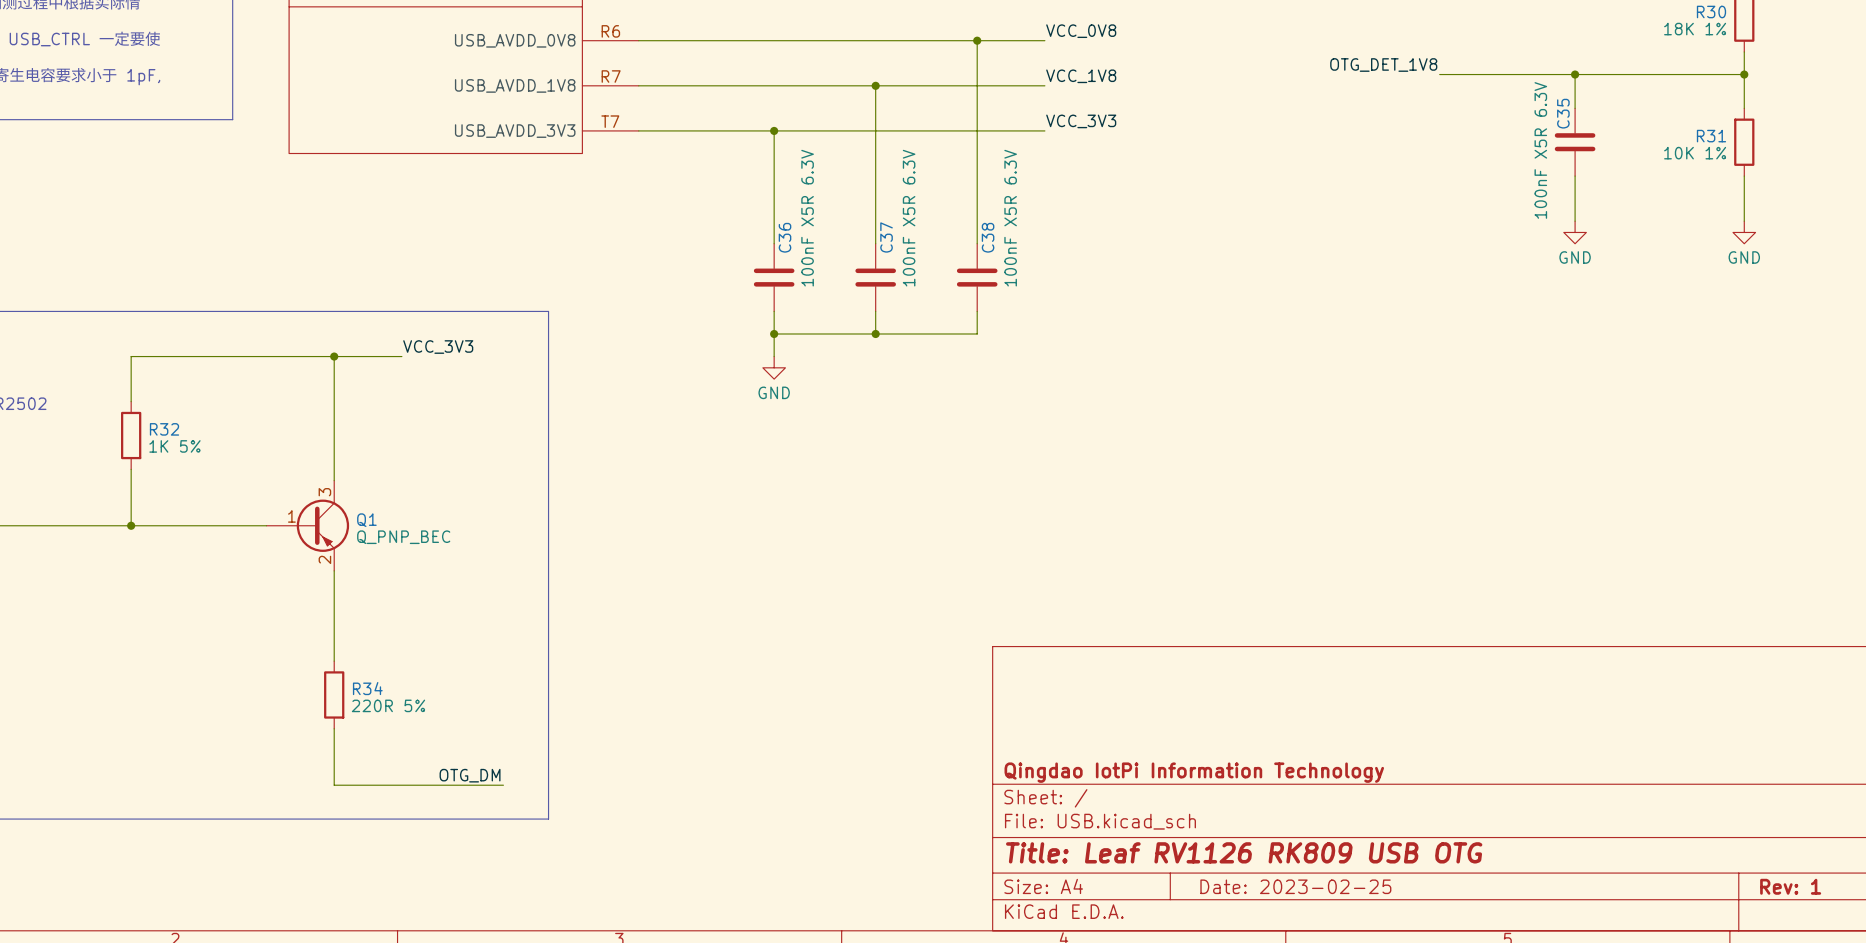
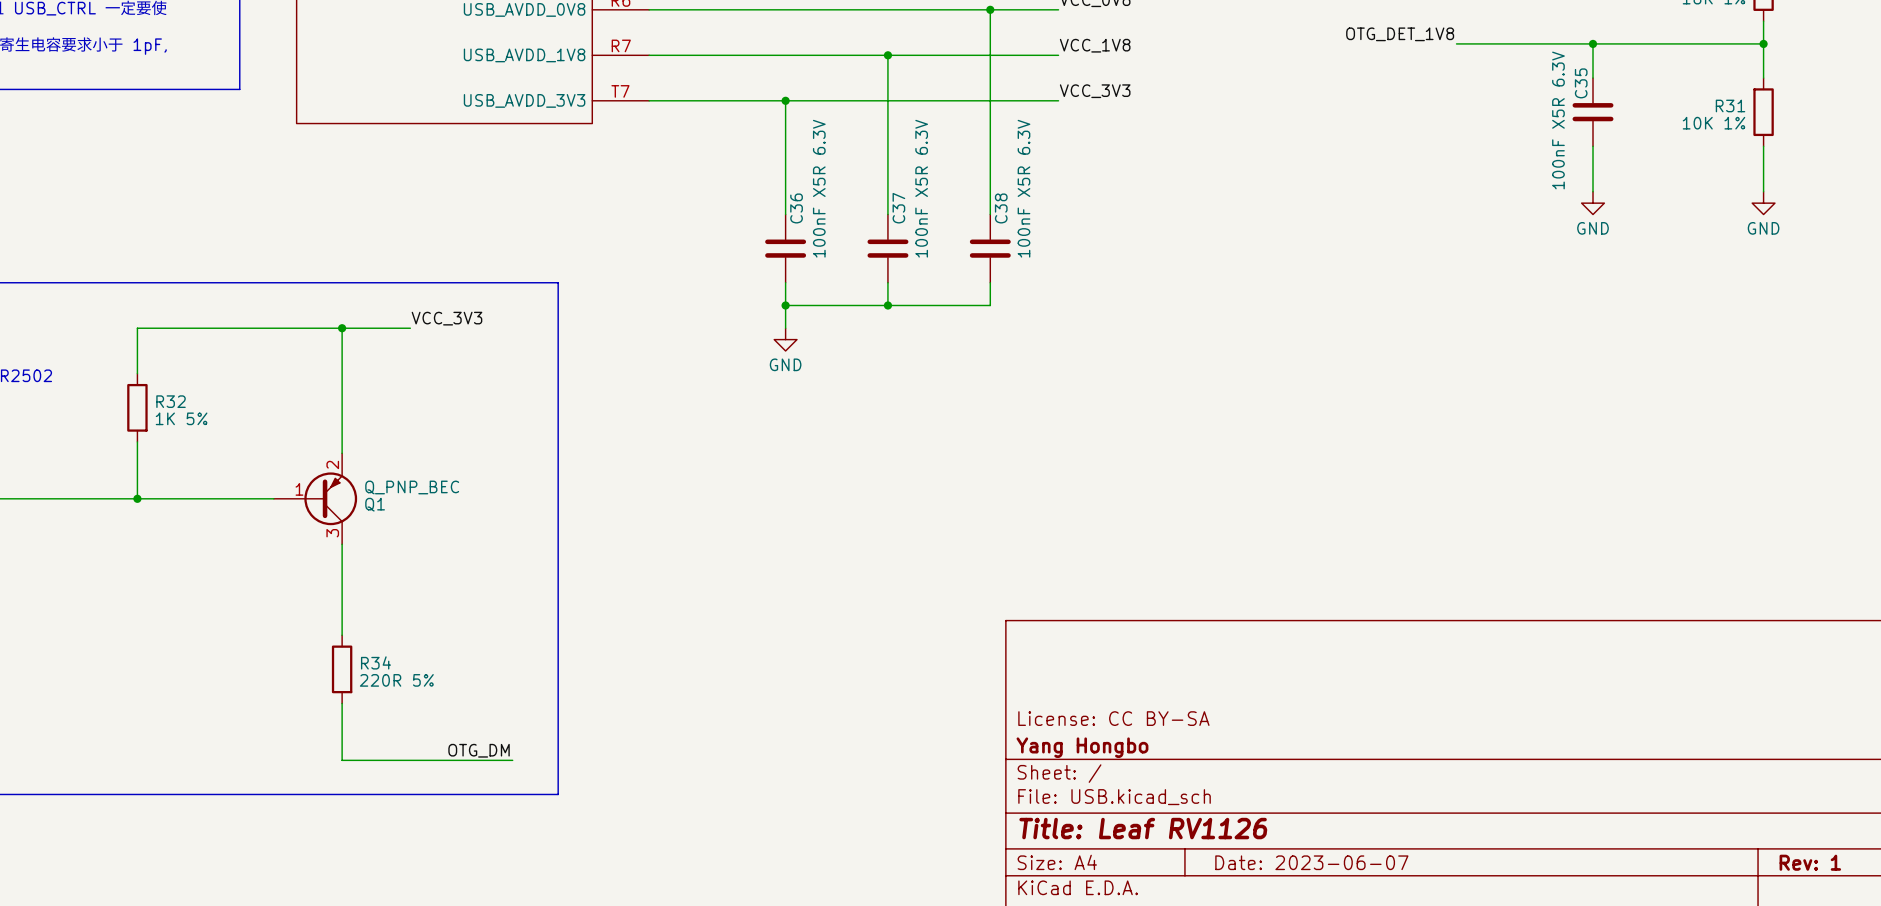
Q1 flip: as is (322, 525) -> up-down (330, 498)
title block: none -> License: CC BY-SA (1113, 718)
title block: Qingdao IotPi Information Technology (1194, 772) -> Yang Hongbo (1082, 747)
title block: Title: Leaf RV1126 RK809 USB OTG (1244, 852) -> Title: Leaf RV1126 (1143, 828)
title block: Date: 2023-02-25 (1295, 886) -> Date: 2023-06-07 (1311, 862)

